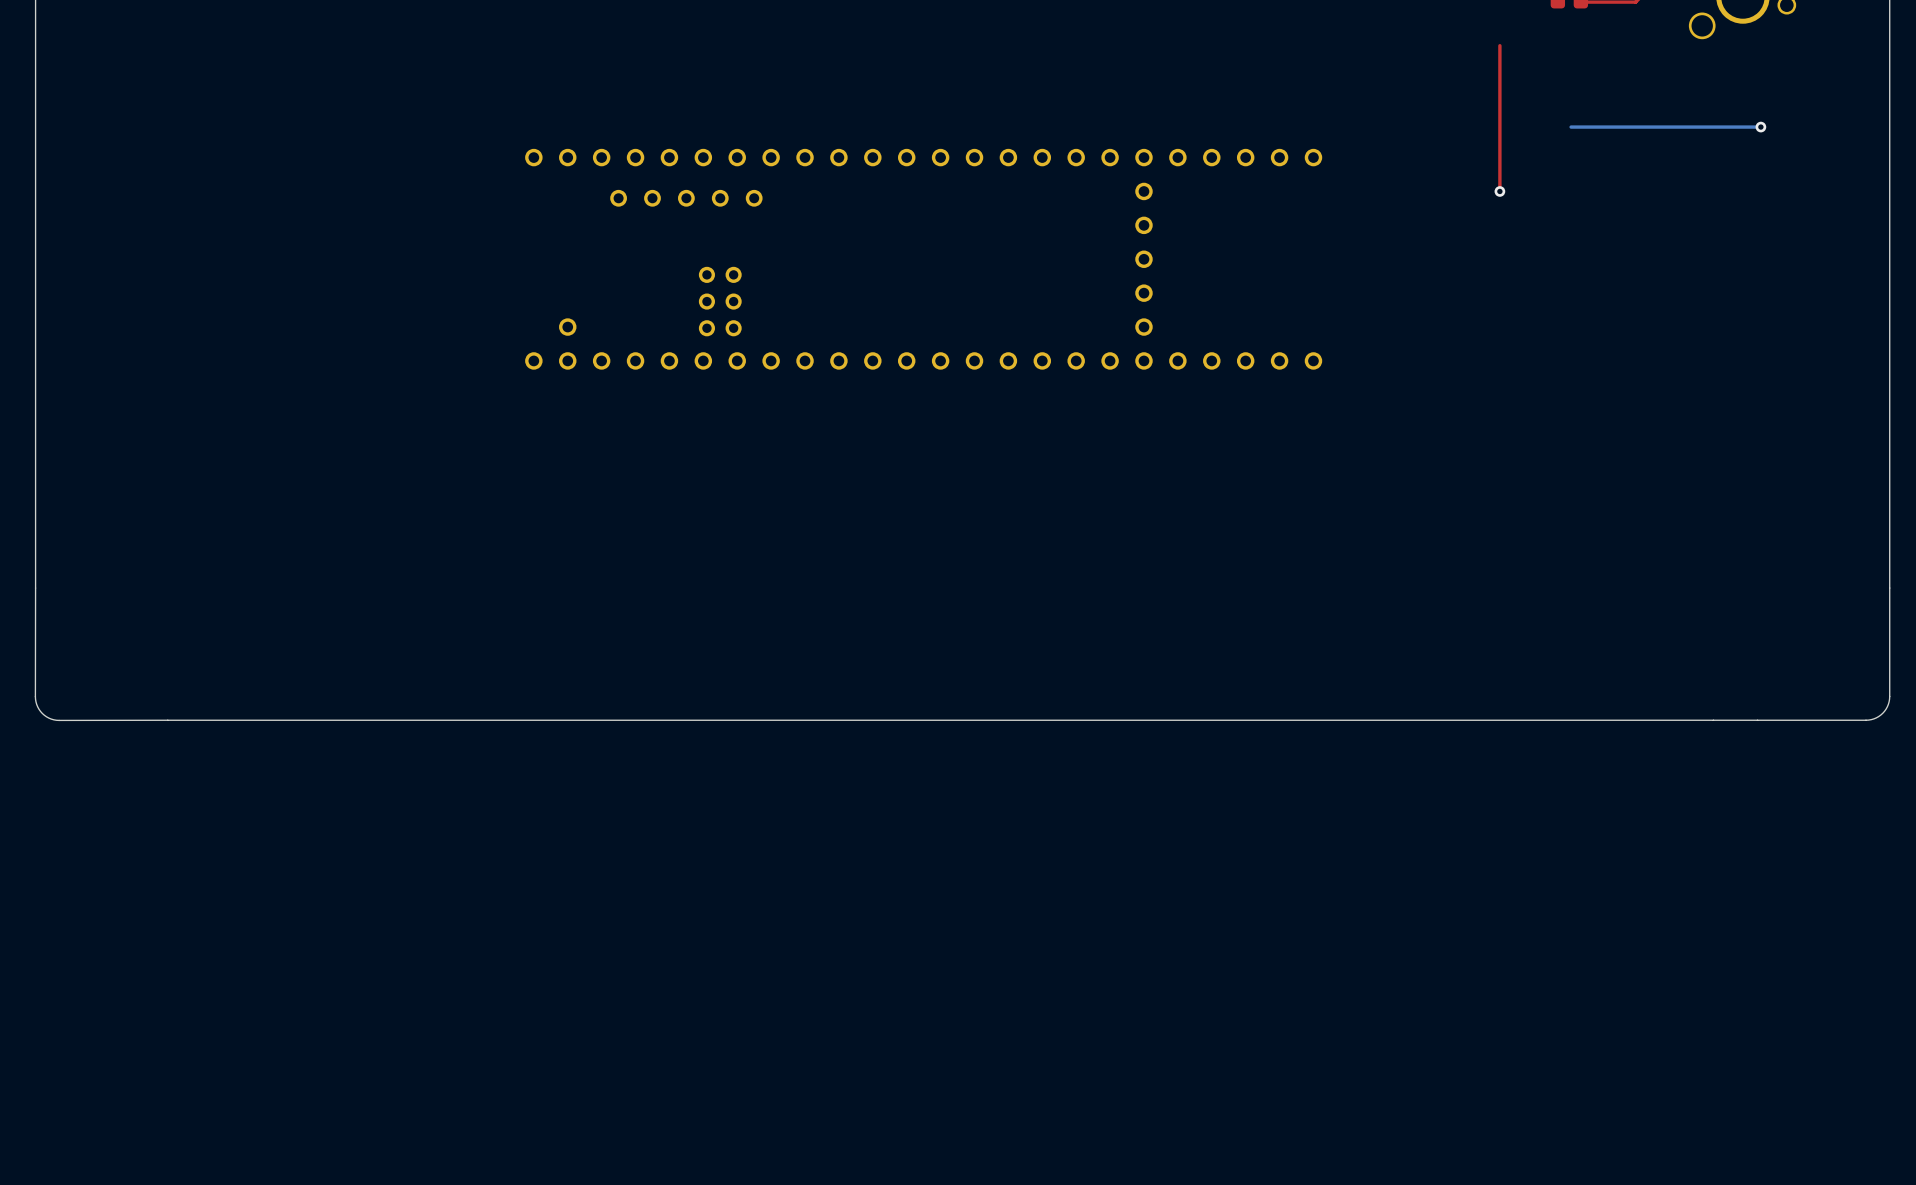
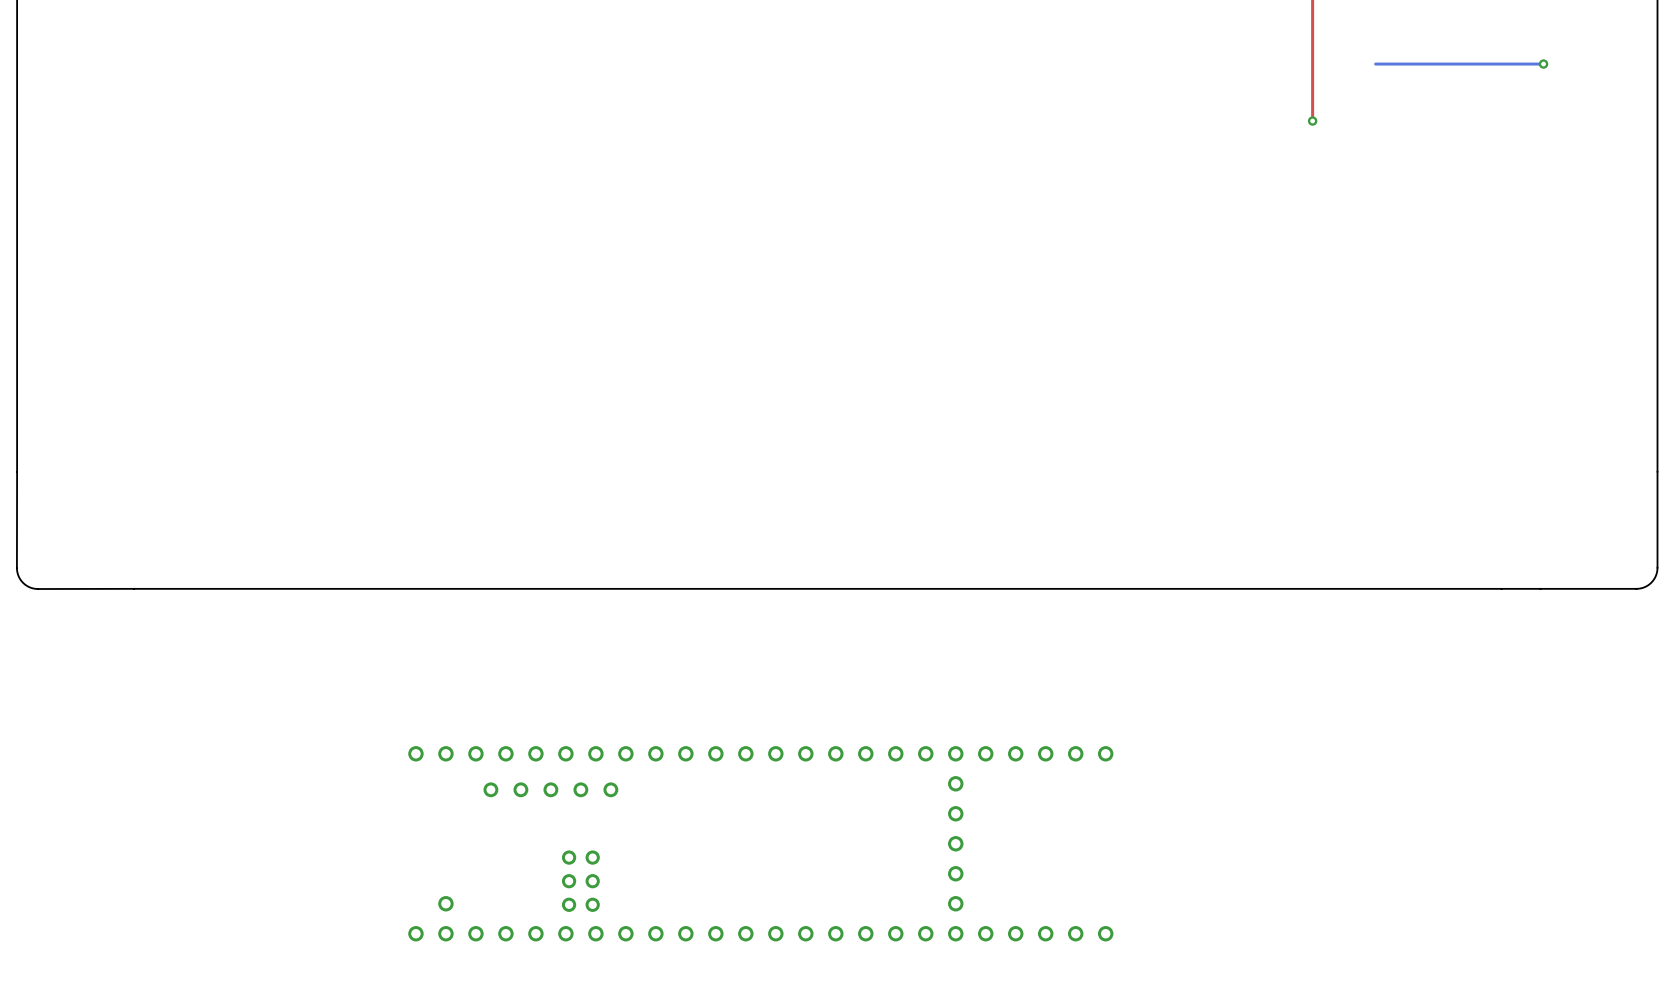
part: (923, 259) -> none
part: none -> (760, 843)

